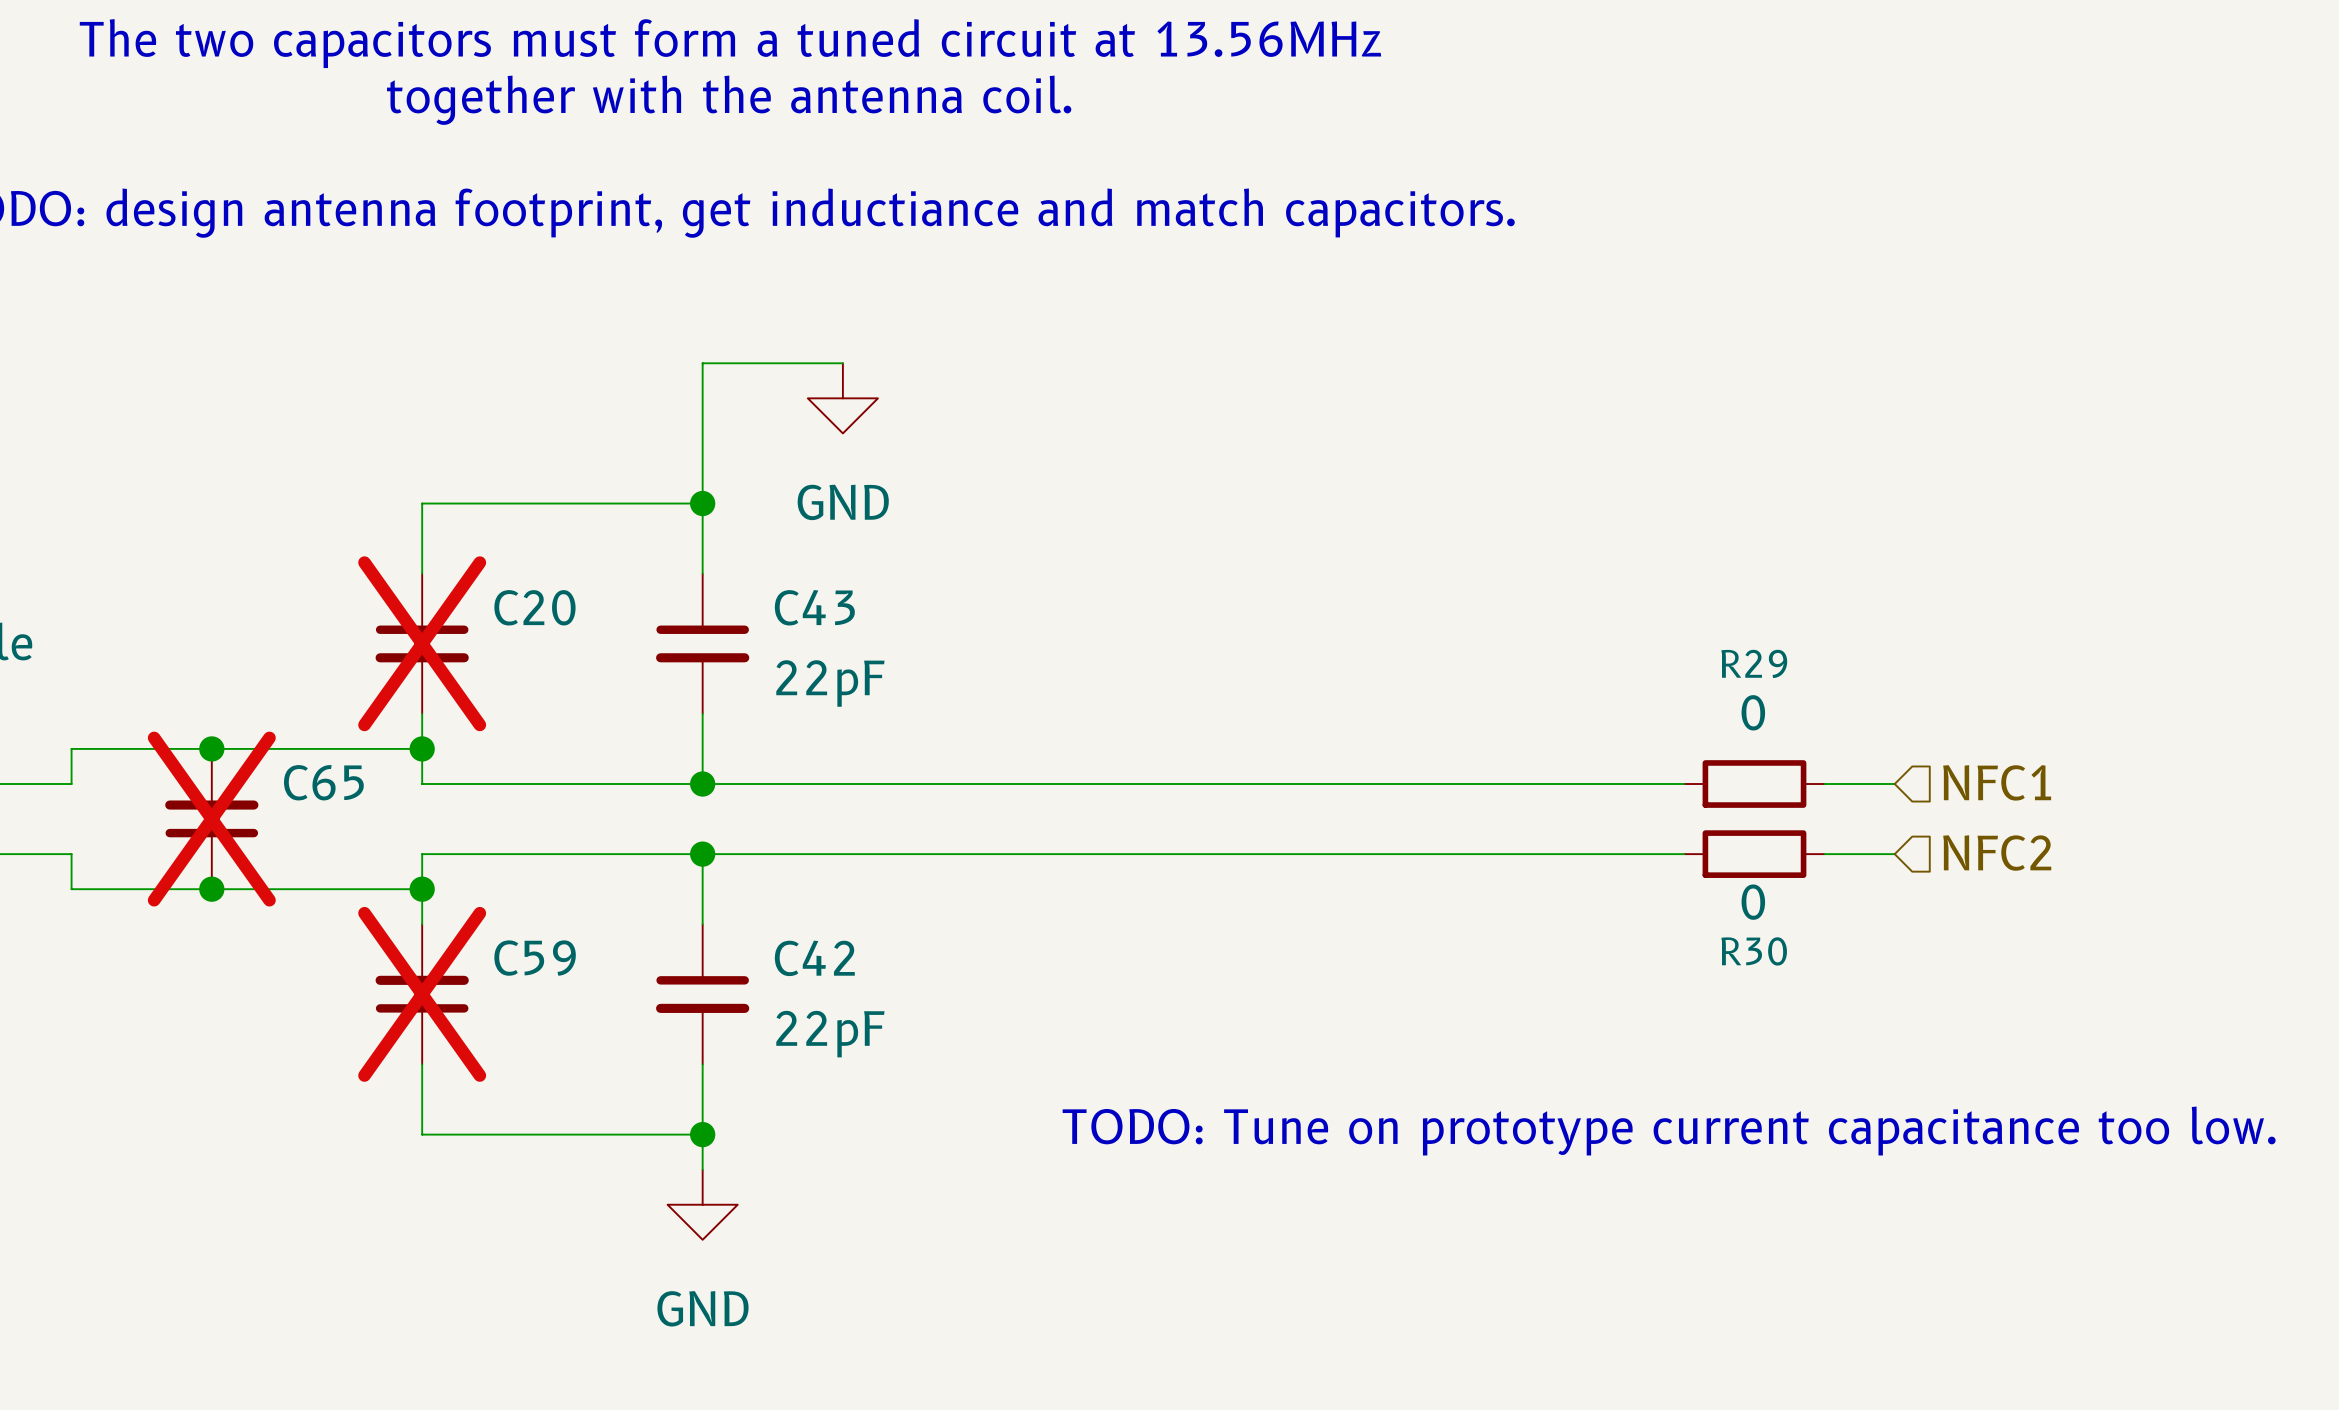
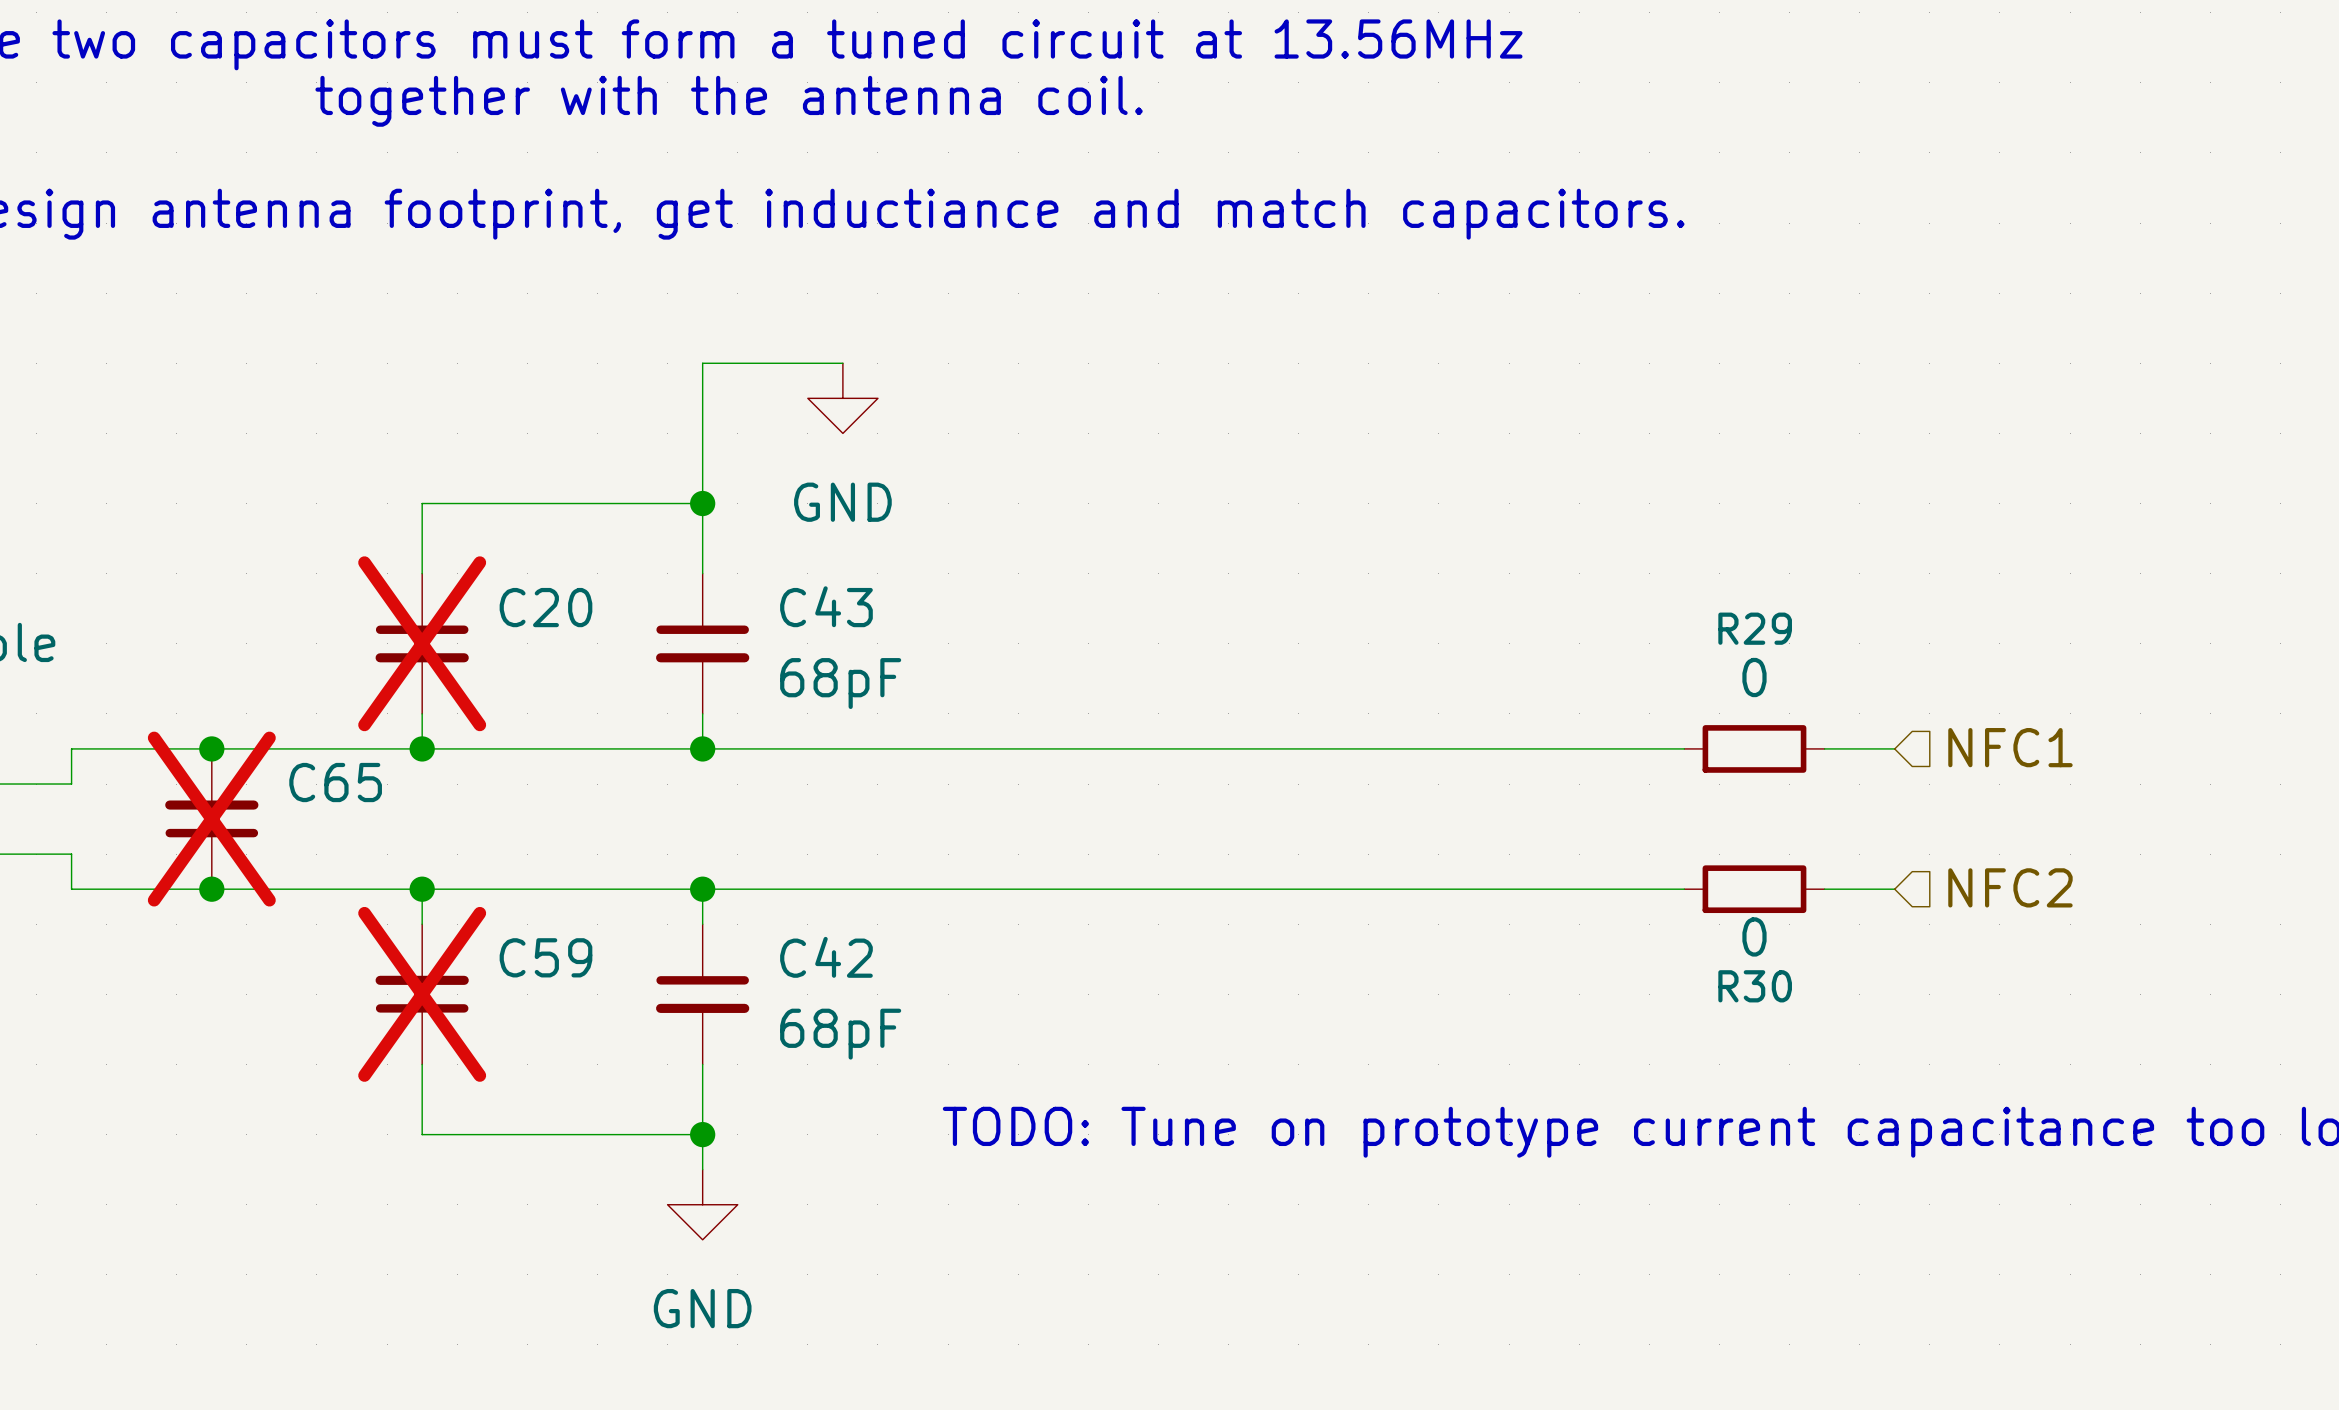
C43 value: 22pF (830, 683) -> 68pF (840, 683)
wire: (422, 748) (422, 784) (1684, 784) -> (422, 748) (1684, 748)
wire: (702, 748) (702, 784) -> none
hierarchical label position: NFC1 (1997, 782) -> NFC1 (2010, 747)
junction position: (702, 784) -> (702, 748)
R29 position: (1754, 784) -> (1754, 748)
wire: (1824, 784) (1894, 784) -> (1824, 748) (1894, 748)
hierarchical label position: NFC2 (1997, 853) -> NFC2 (2010, 887)
wire: (702, 854) (702, 889) -> none
junction position: (702, 854) -> (702, 889)
wire: (1684, 854) (422, 854) (422, 889) -> (1684, 889) (422, 889)
R30 position: (1754, 854) -> (1754, 889)
wire: (1824, 854) (1894, 854) -> (1824, 889) (1894, 889)
C42 value: 22pF (830, 1034) -> 68pF (840, 1034)

